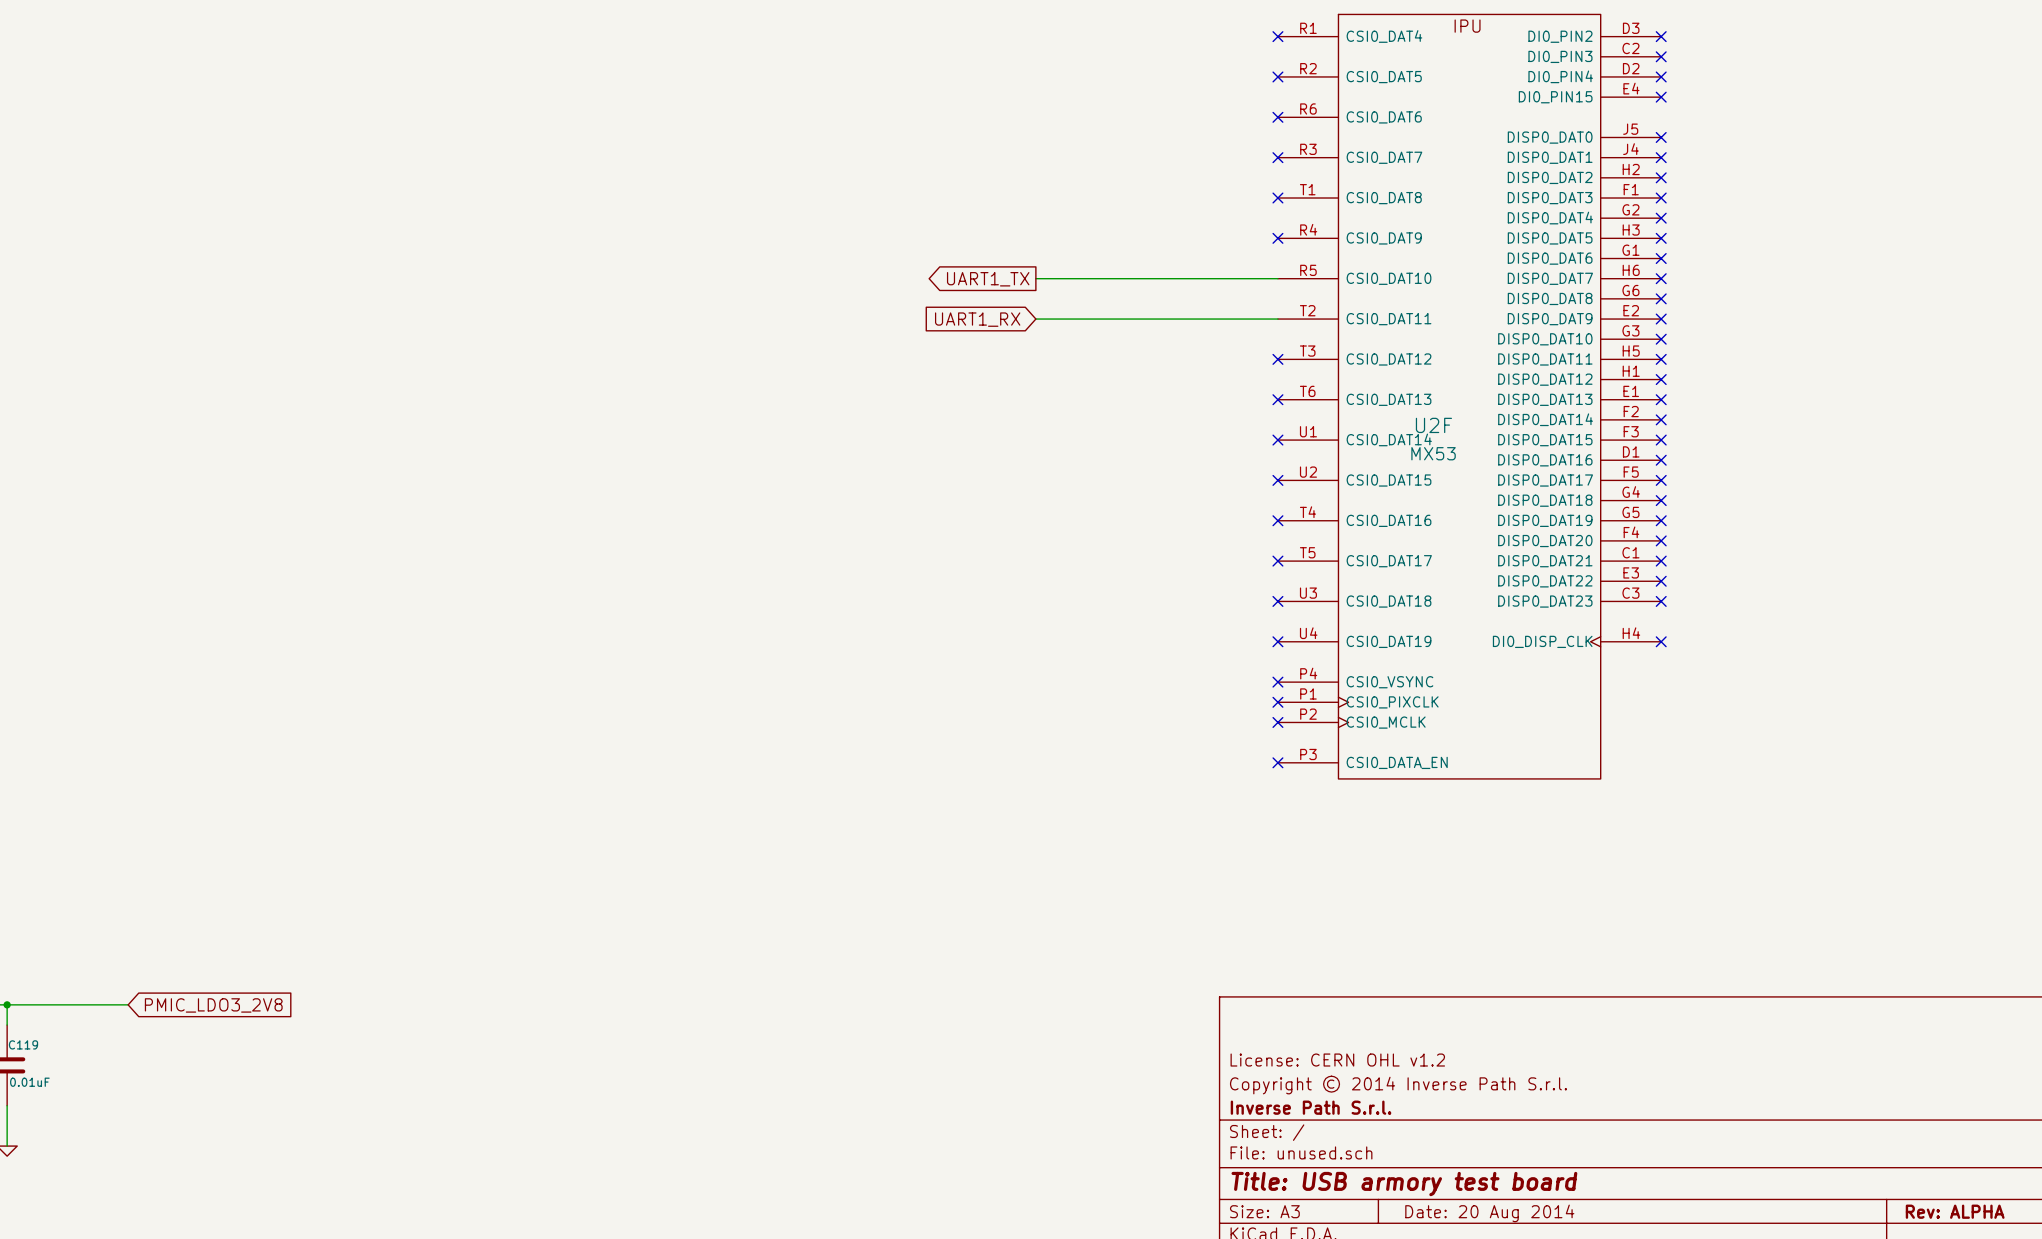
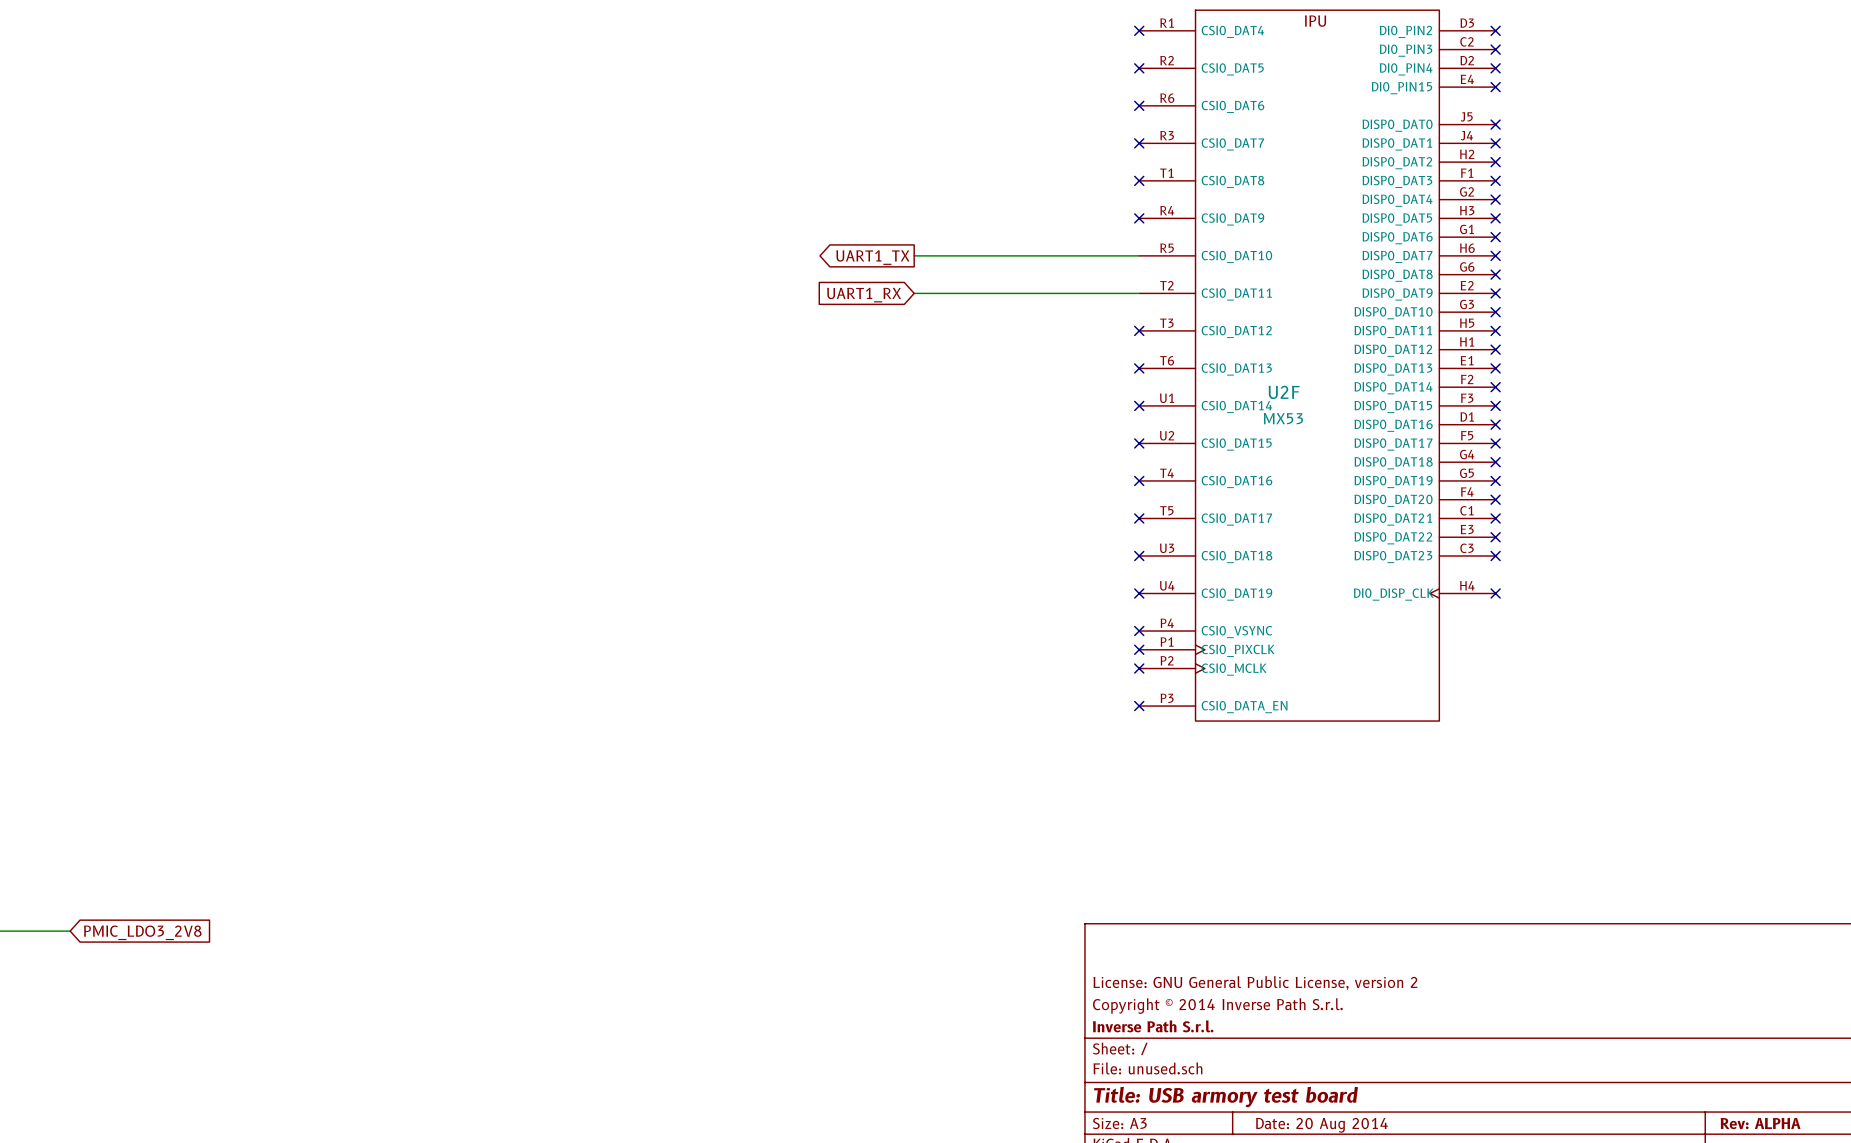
title block: License: CERN OHL v1.2 (1337, 1060) -> License: GNU General Public License, version 2 (1255, 983)

